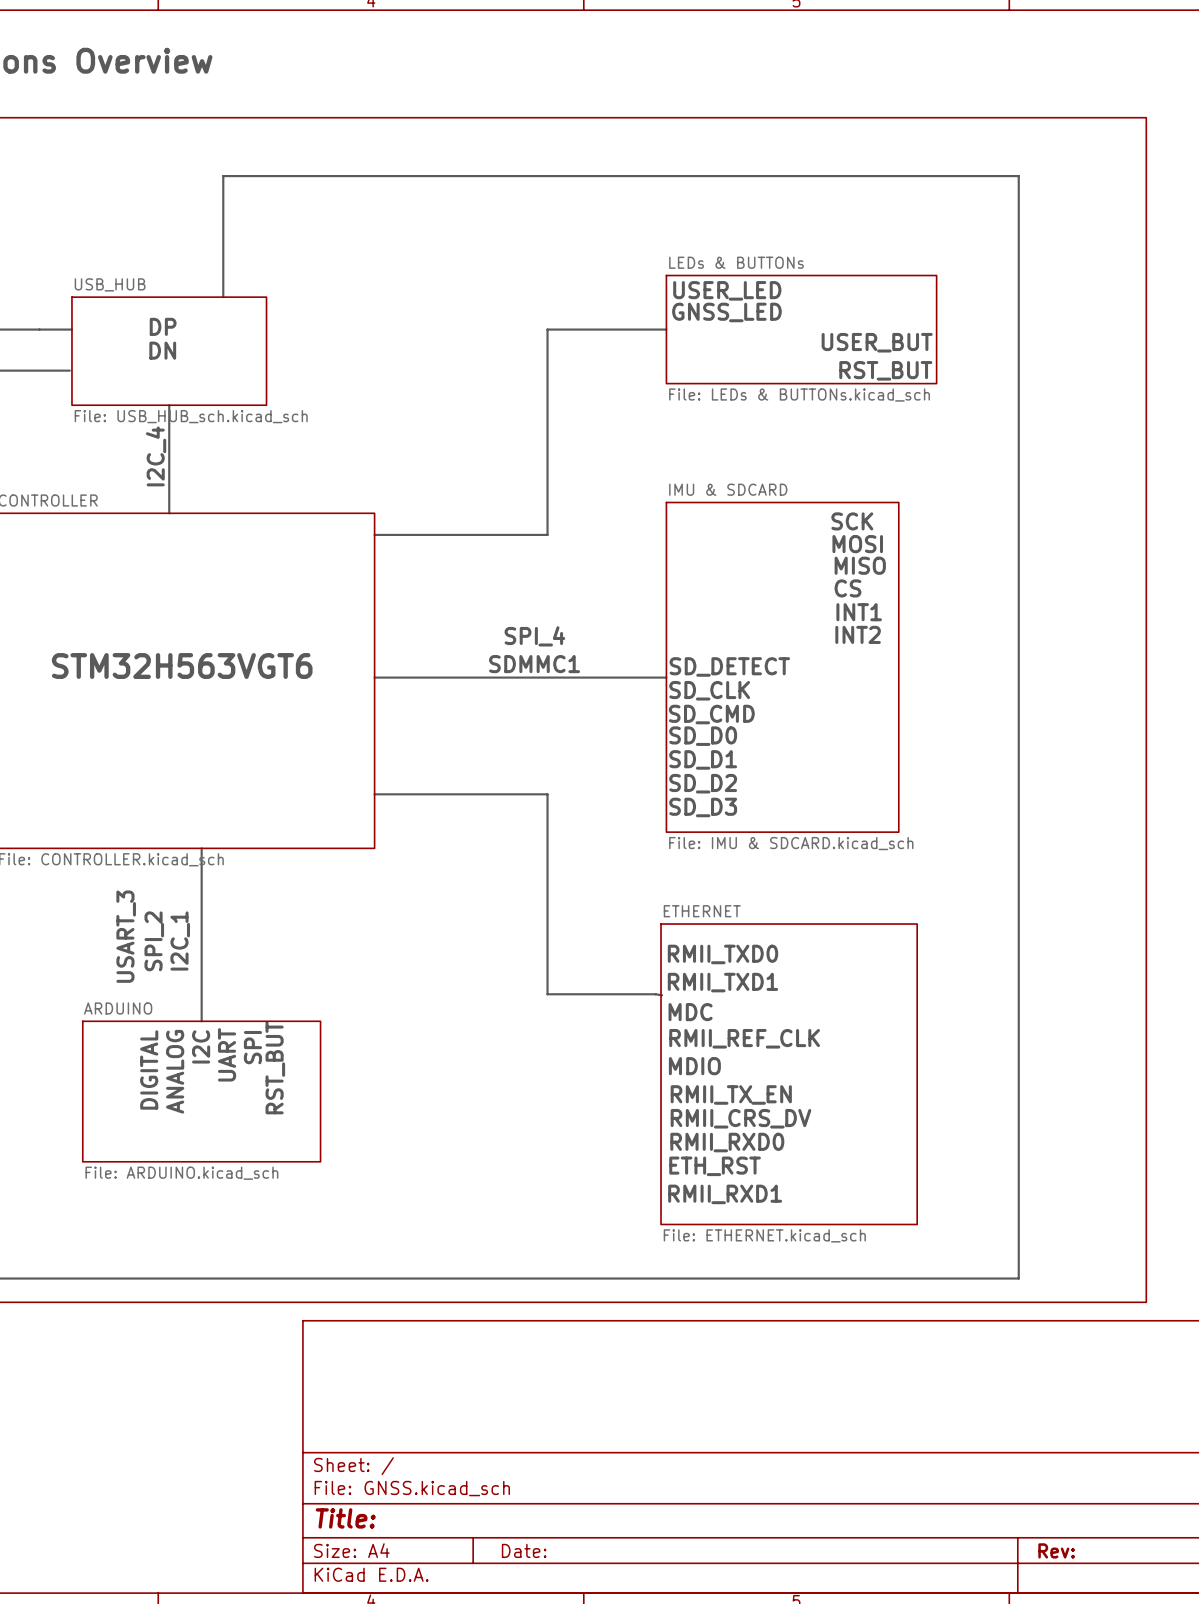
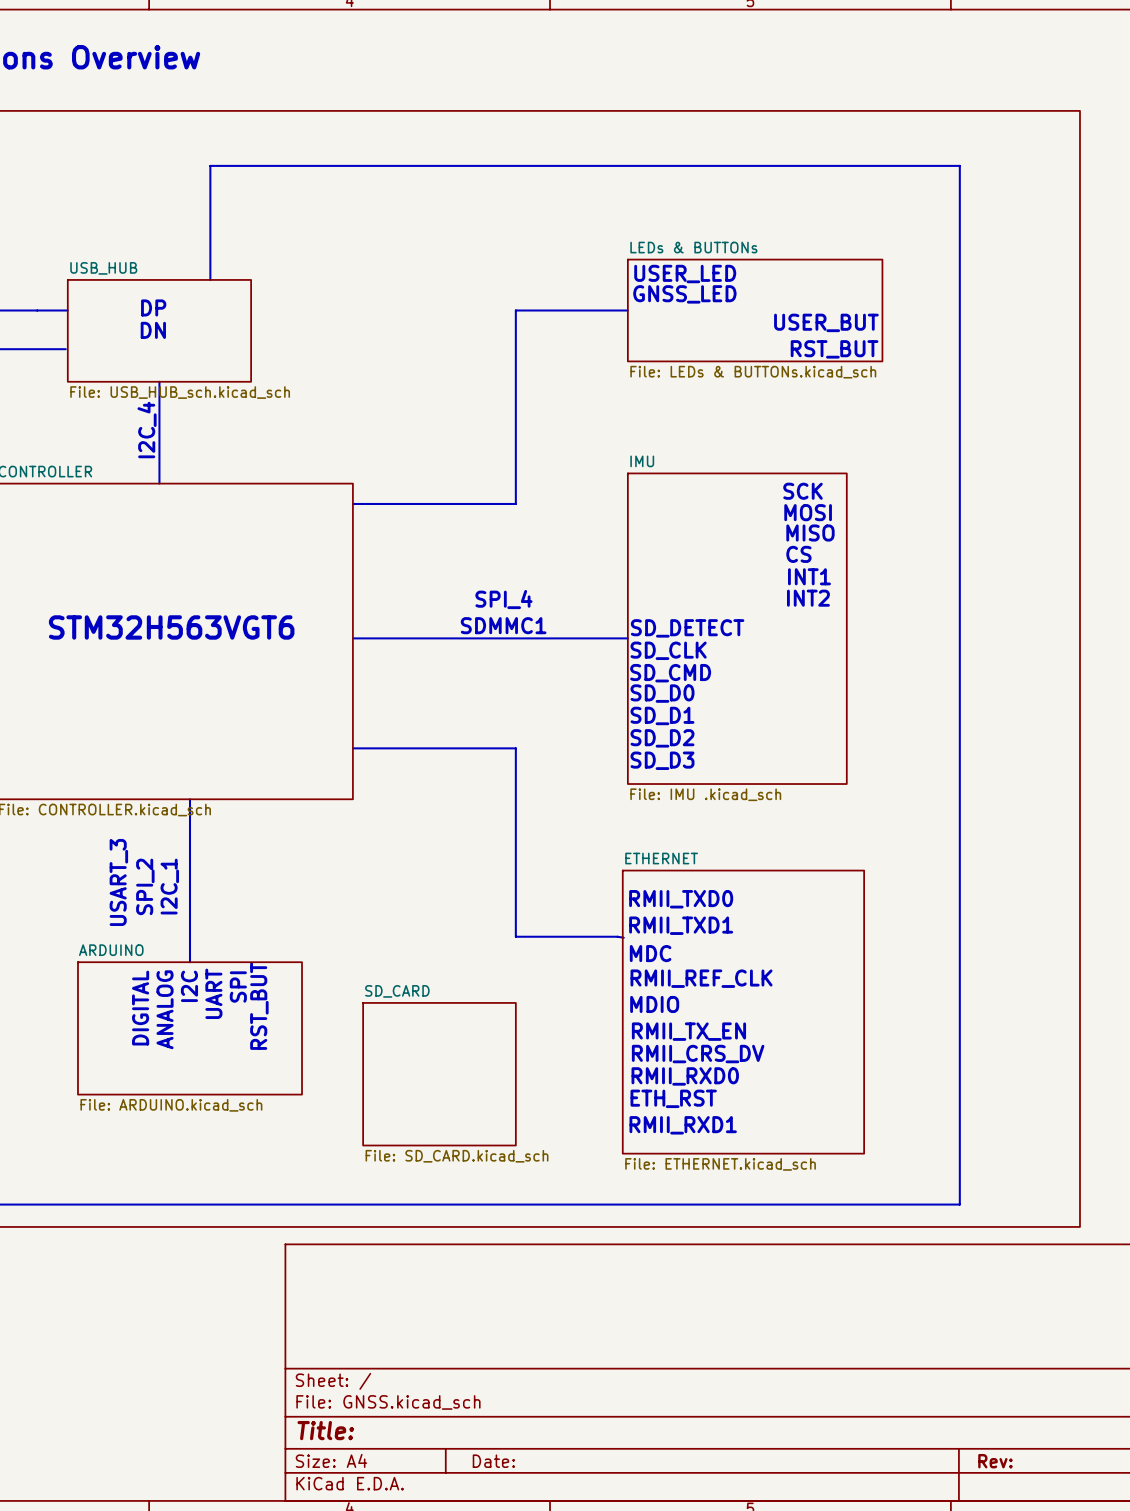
sheet IMU & SDCARD name: IMU & SDCARD (728, 489) -> IMU (642, 461)
sheet IMU & SDCARD value: File: IMU & SDCARD.kicad_sch (791, 843) -> File: IMU .kicad_sch (705, 794)
sheet SD_CARD: none -> File: SD_CARD.kicad_sch (439, 1074)

